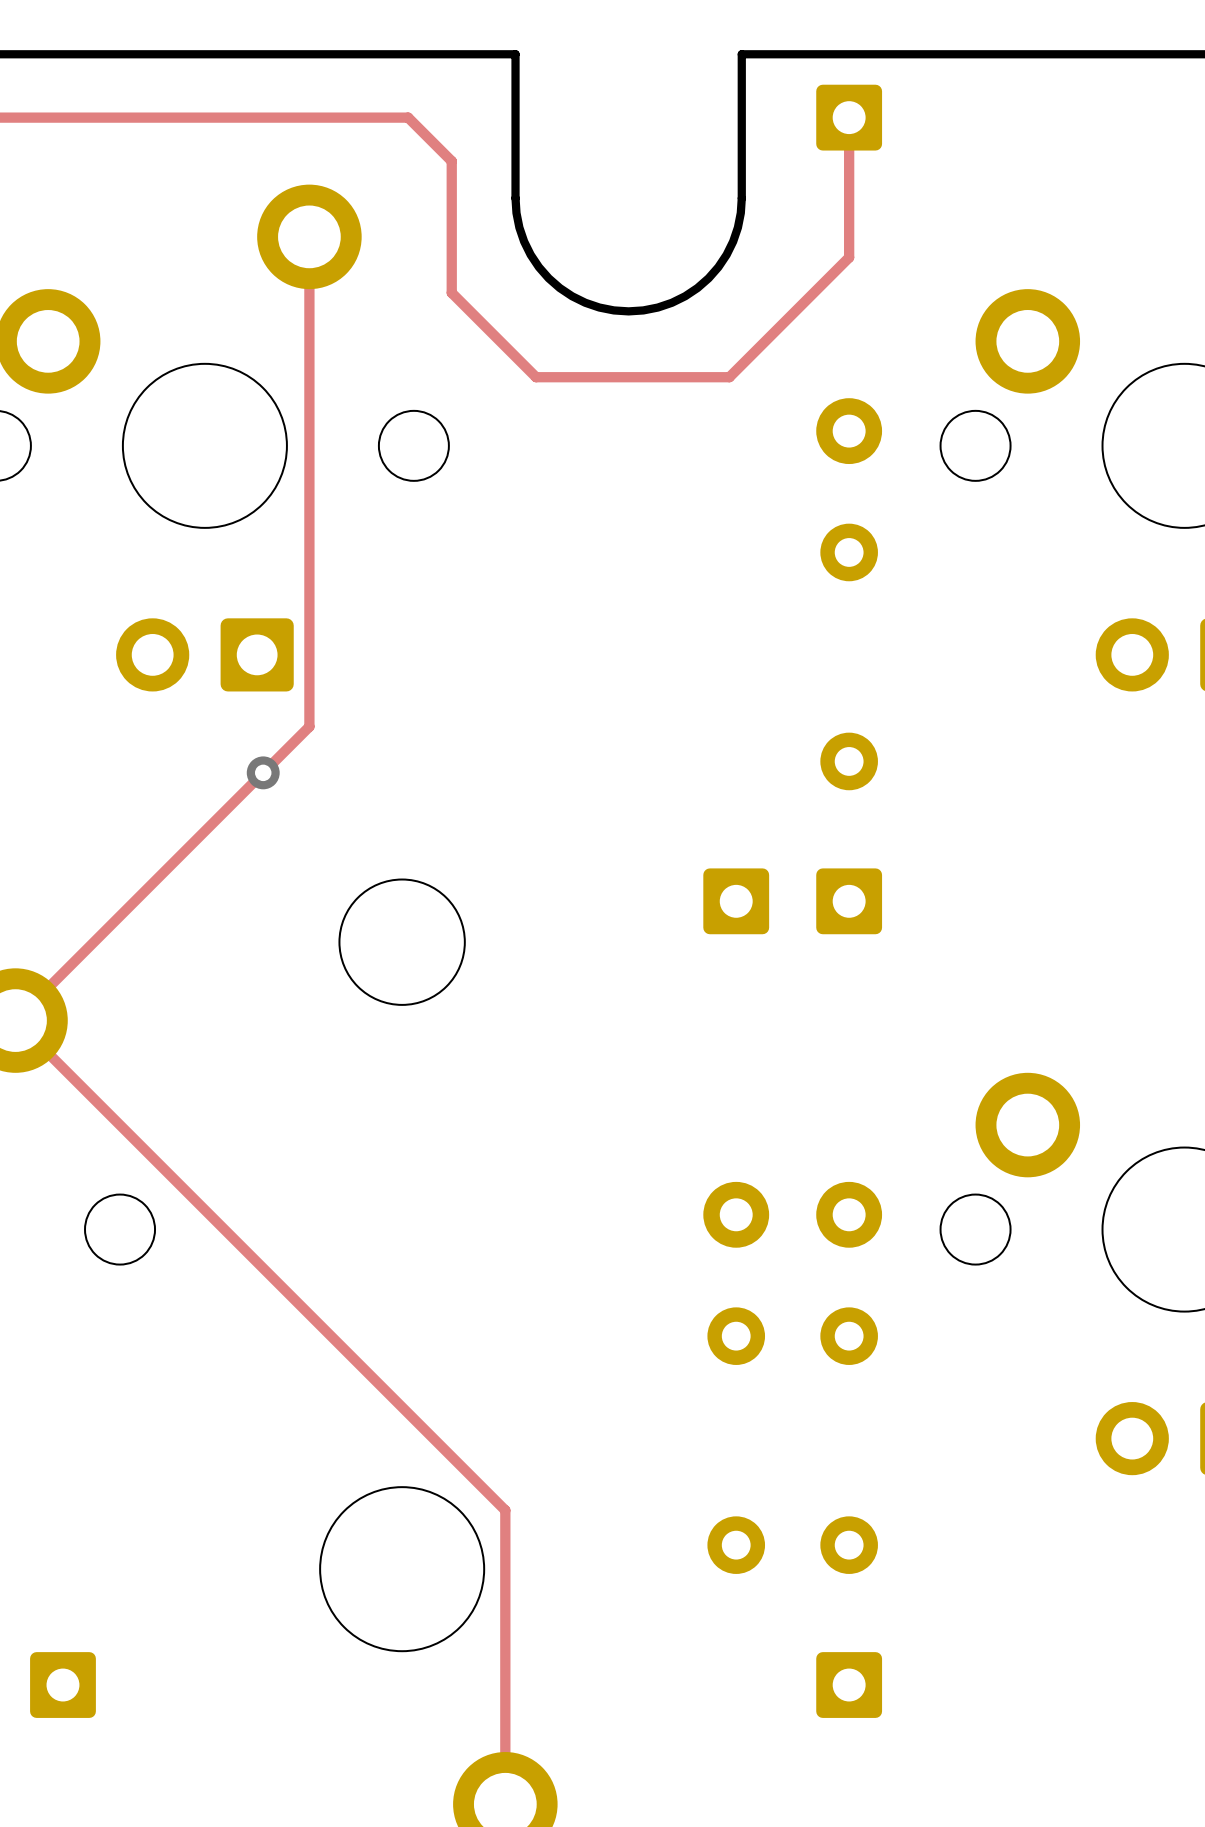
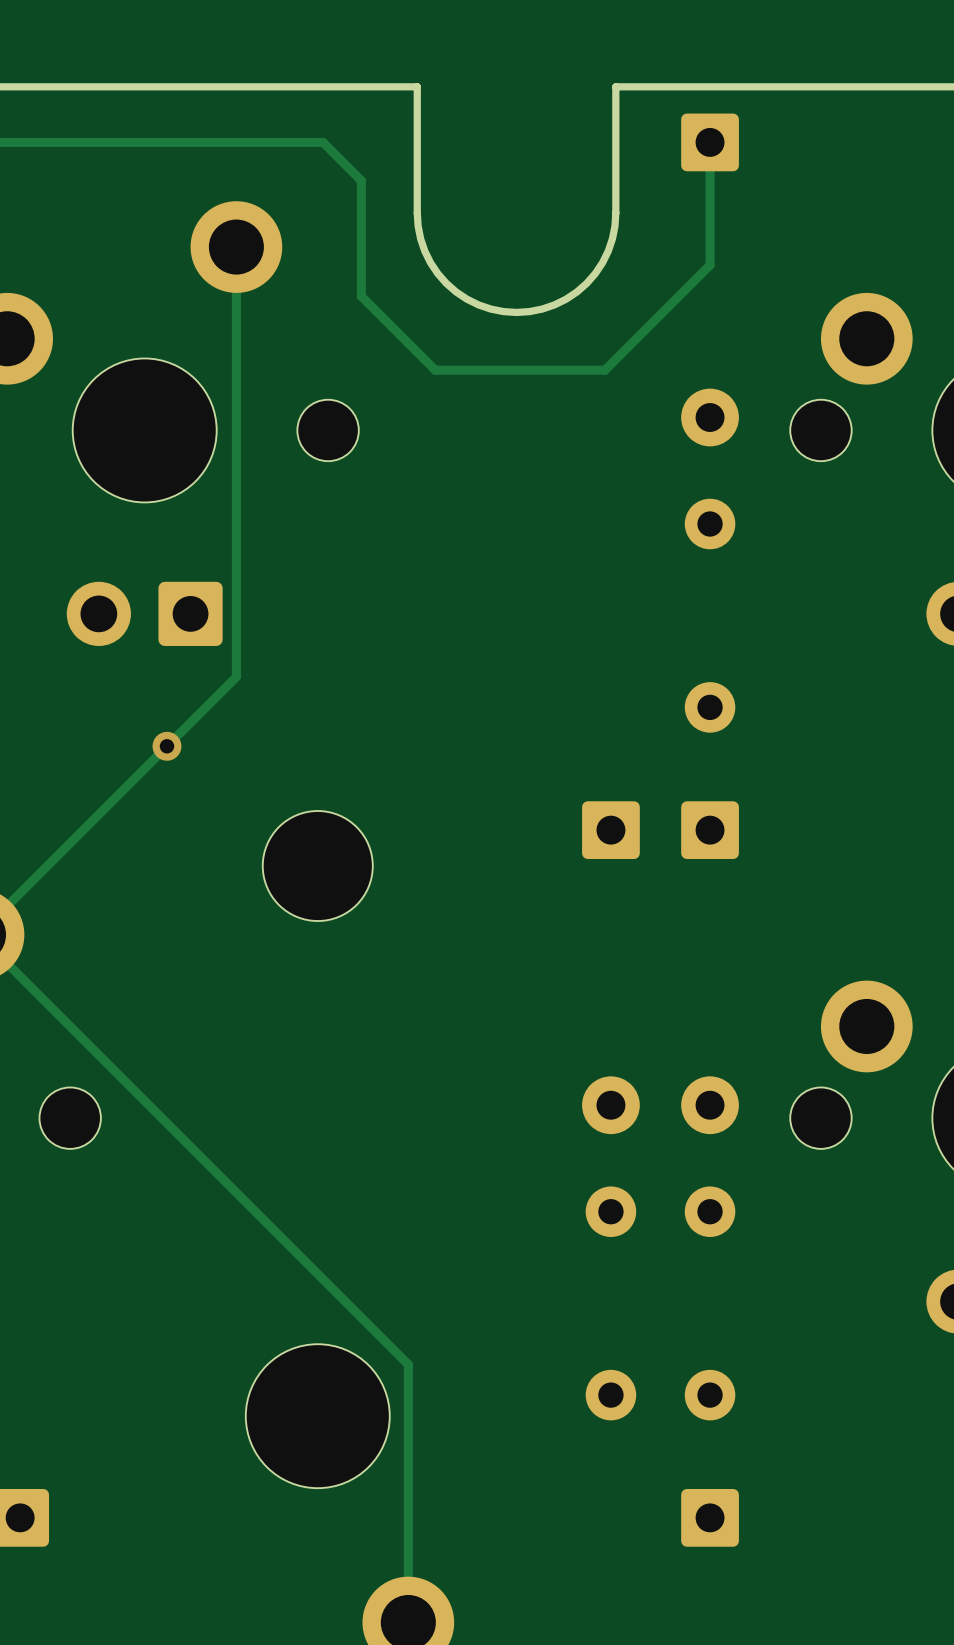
via position: (263, 772) -> (166, 746)

